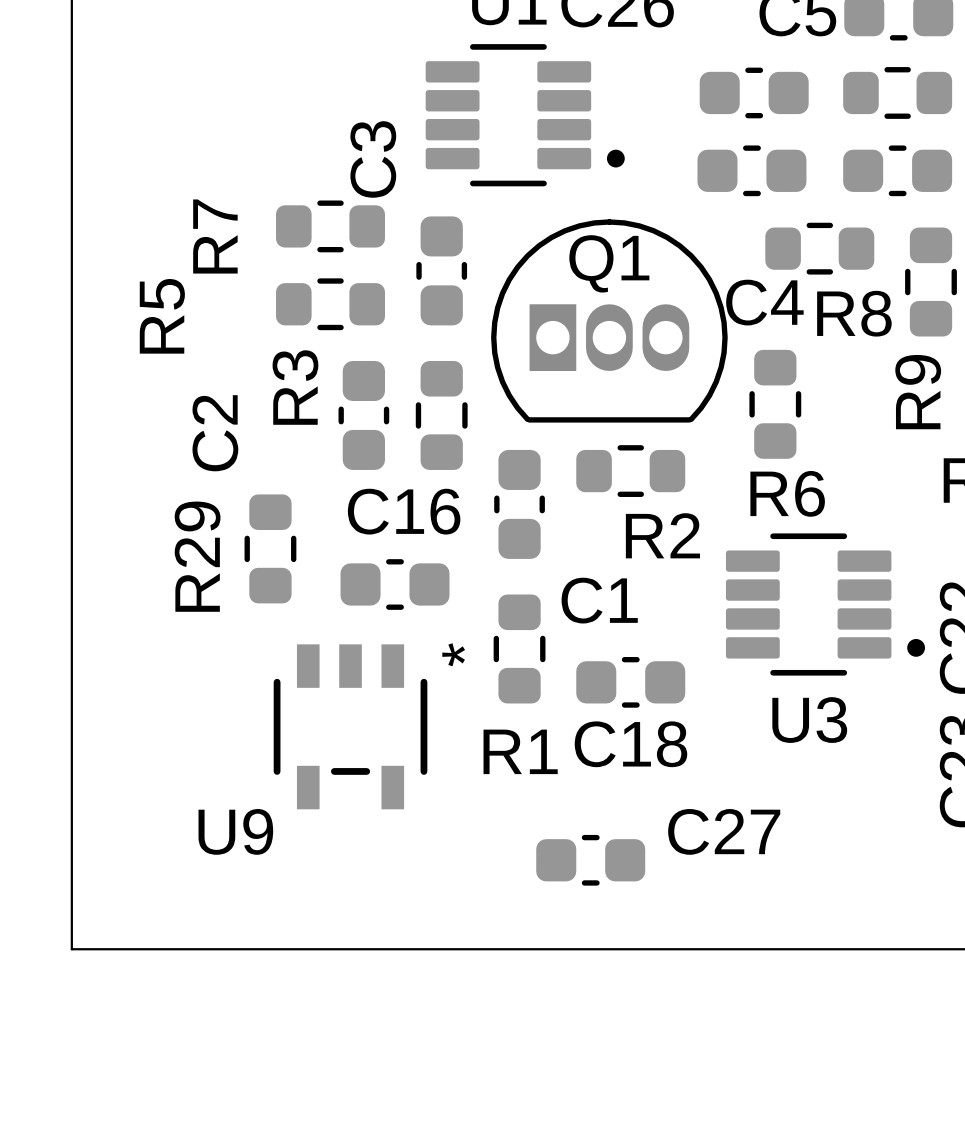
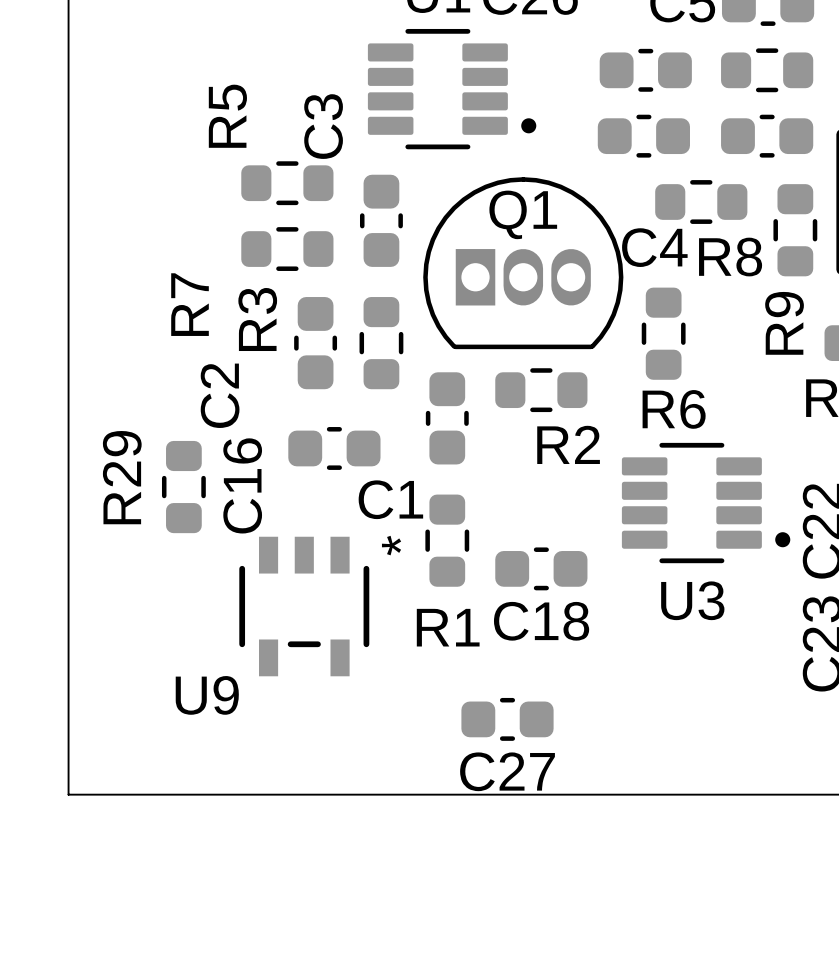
R7 name position: R7 (215, 236) -> R7 (190, 304)
R5 name position: R5 (162, 316) -> R5 (227, 116)
C2 name position: C2 (215, 433) -> C2 (220, 395)
C16 name rotation: 0° (404, 511) -> 90° counterclockwise (242, 485)
R29 position: (270, 548) -> (183, 487)
R29 name position: R29 (197, 556) -> R29 (122, 477)
C16 position: (395, 584) -> (334, 448)
C1 name position: C1 (599, 600) -> C1 (390, 499)
C27 name position: C27 (724, 831) -> C27 (507, 771)

